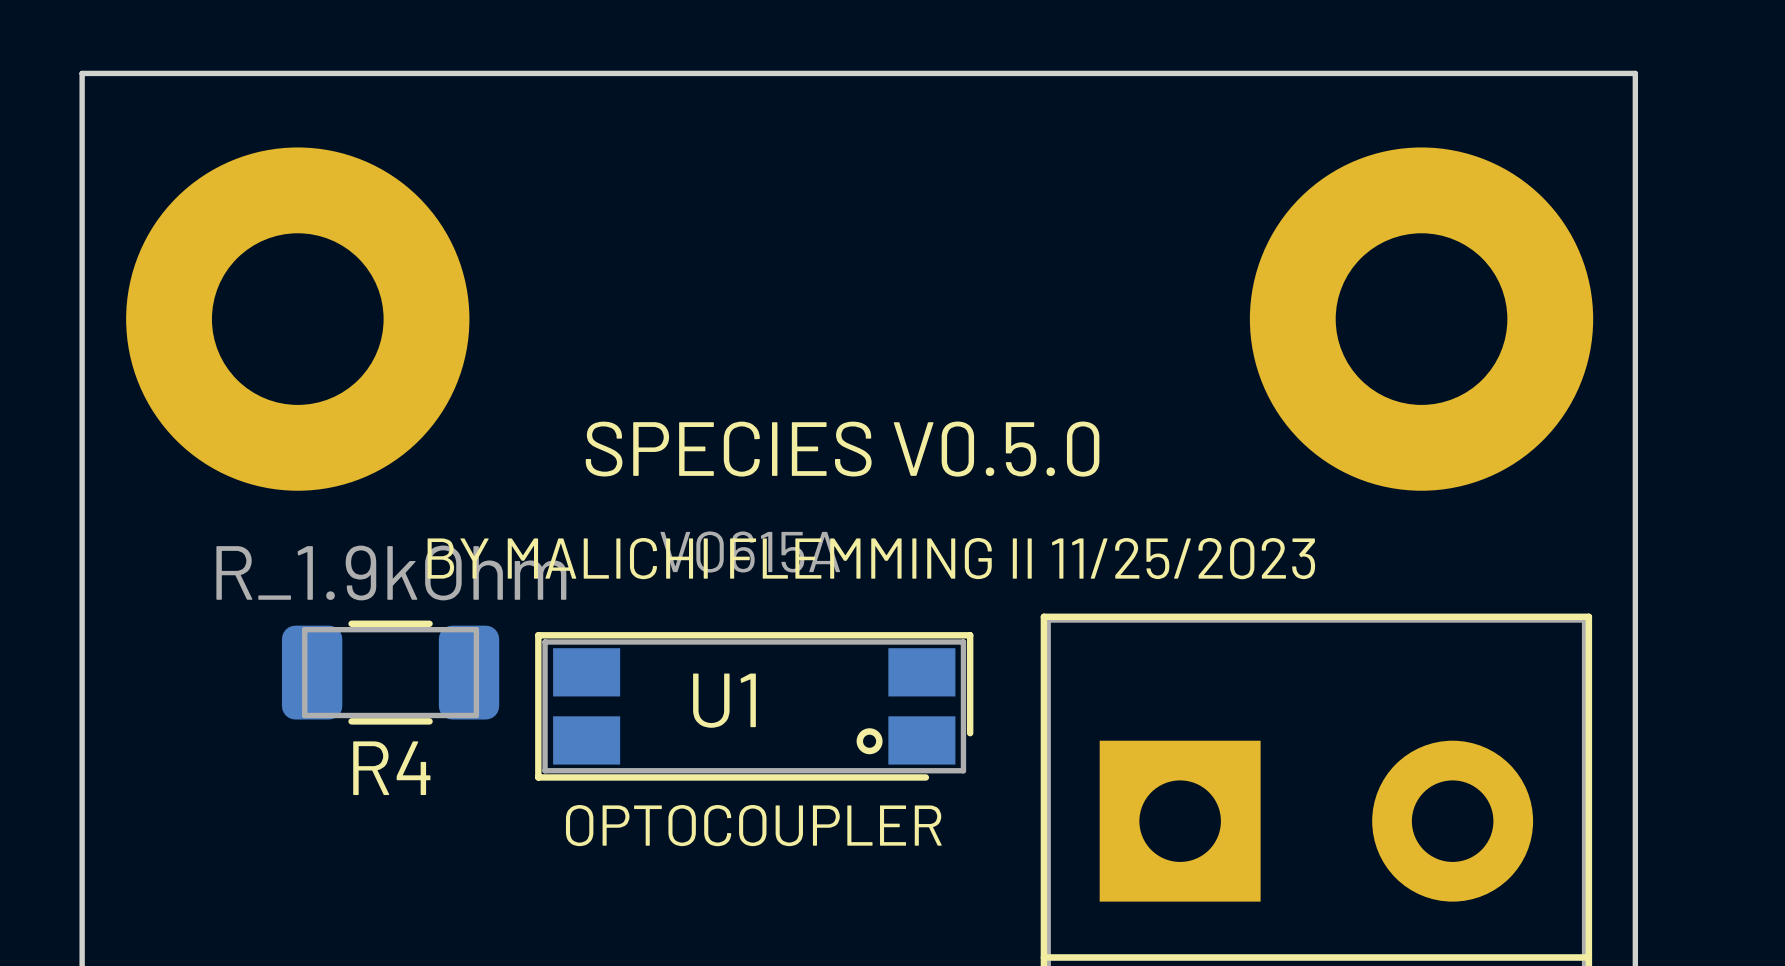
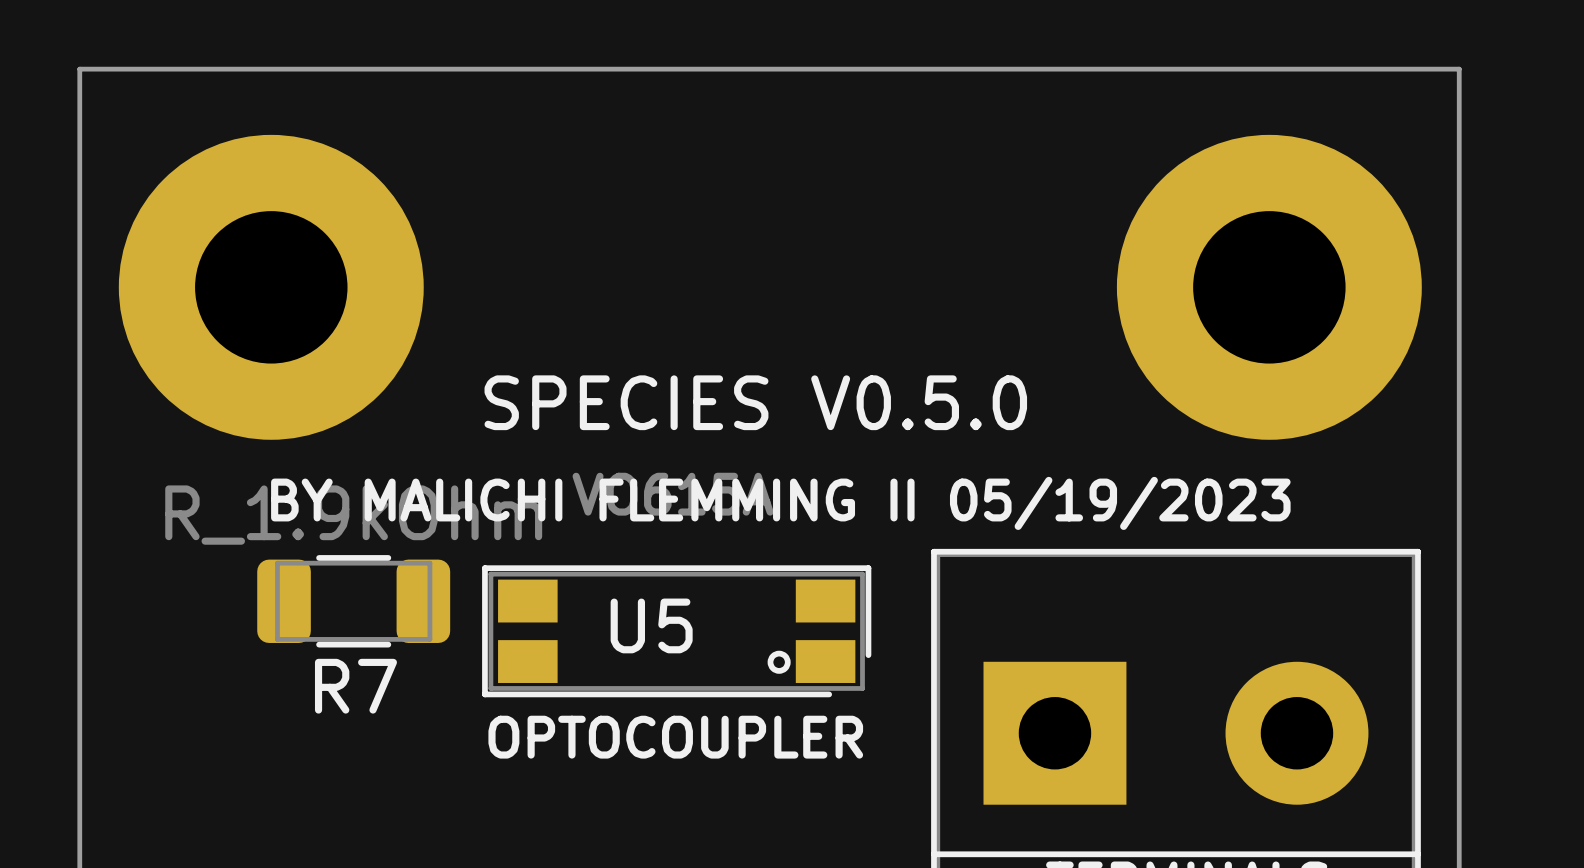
text: BY MALICHI FLEMMING II 11/25/2023 (871, 558) -> BY MALICHI FLEMMING II 05/19/2023 (780, 503)
U1 name: U1 (724, 700) -> U5 (651, 625)
R4 name: R4 (391, 768) -> R7 (355, 686)

